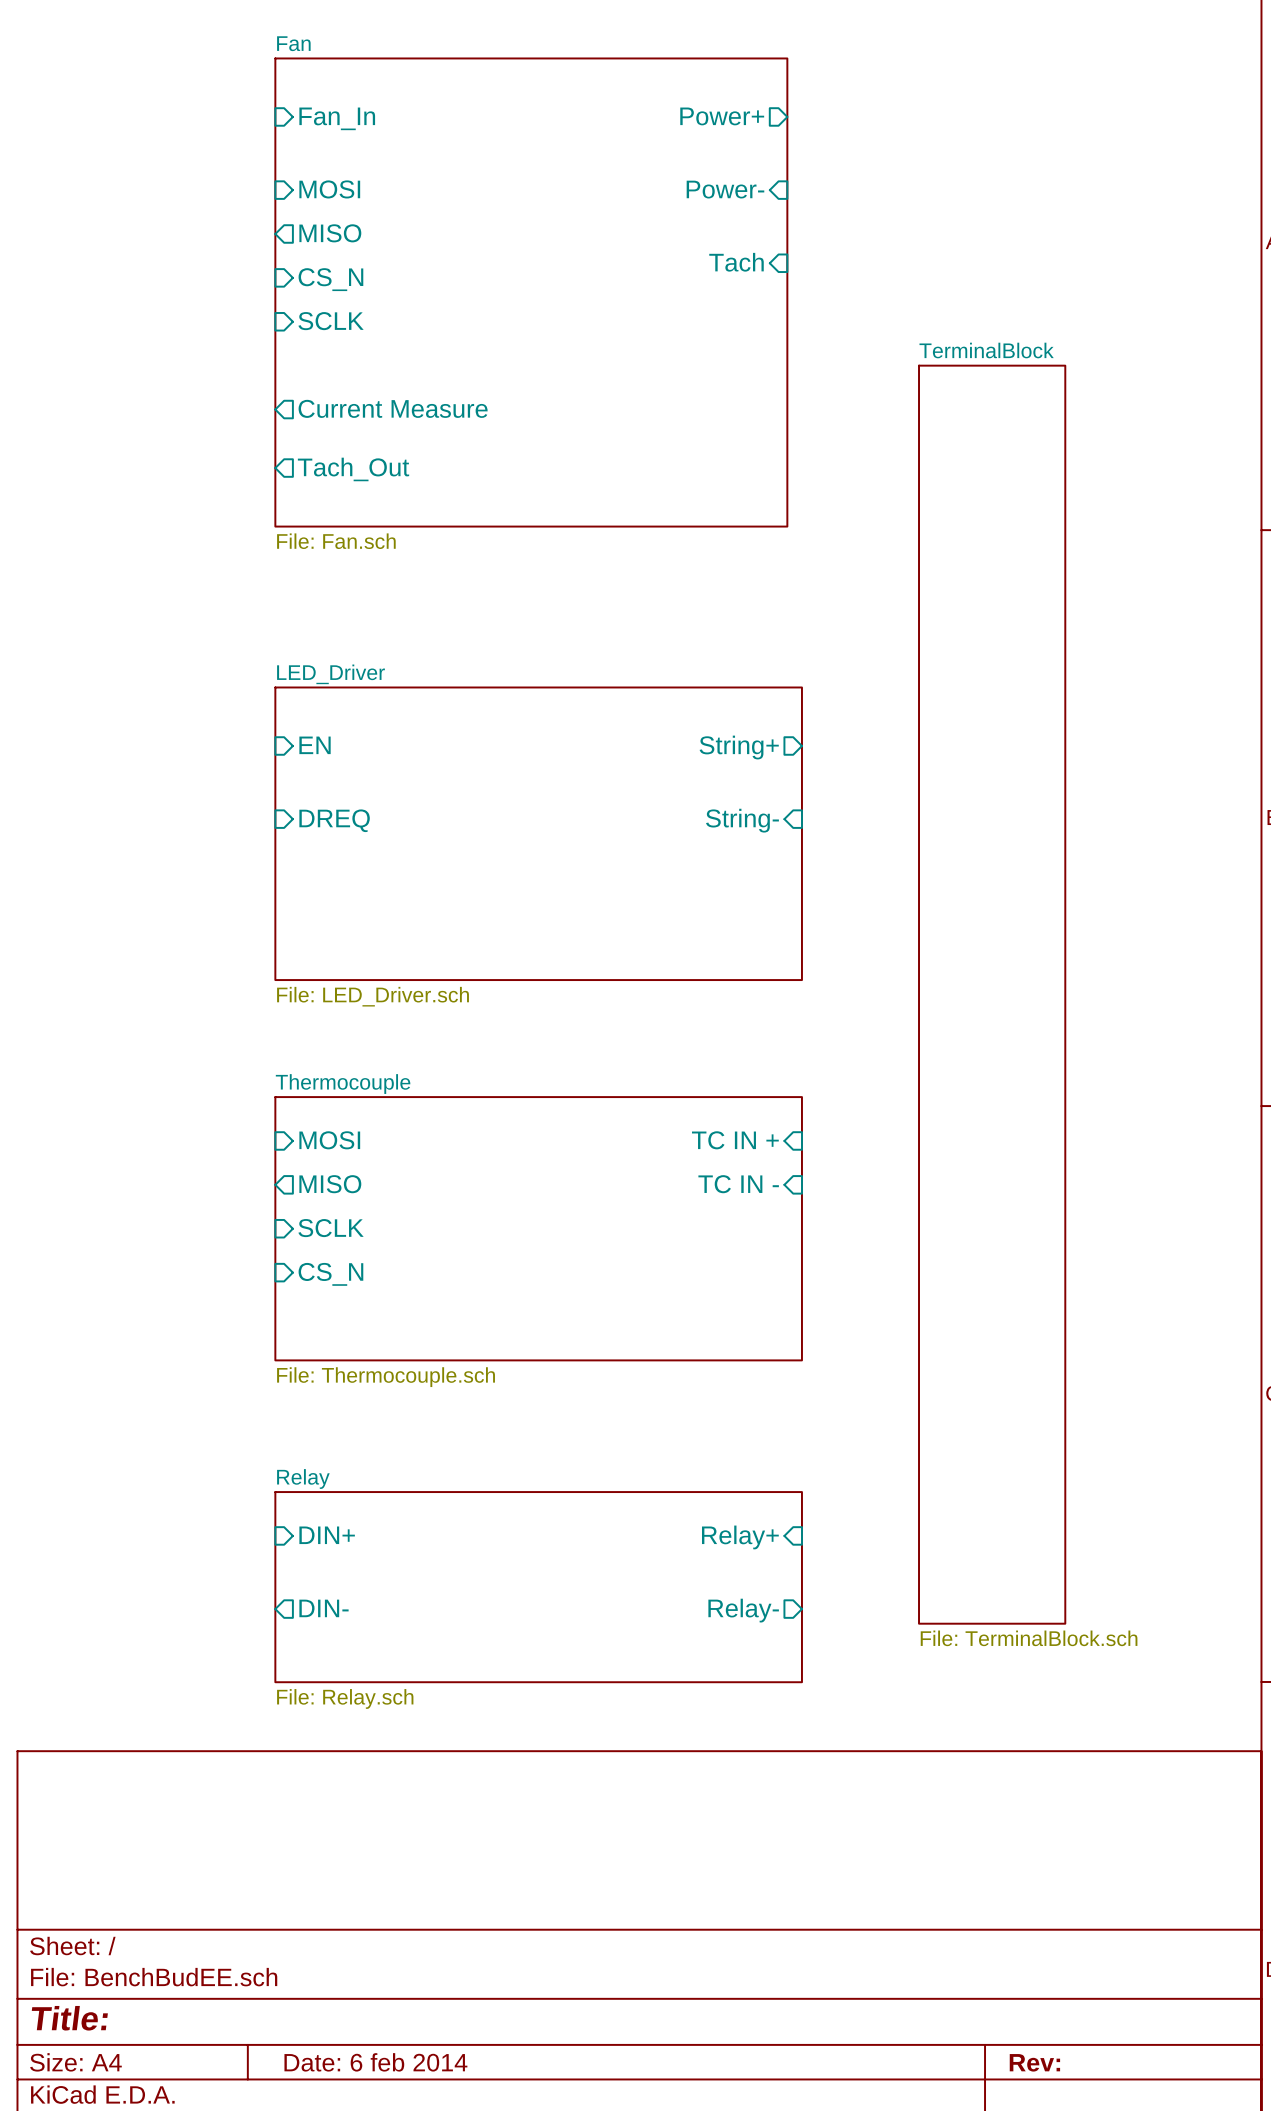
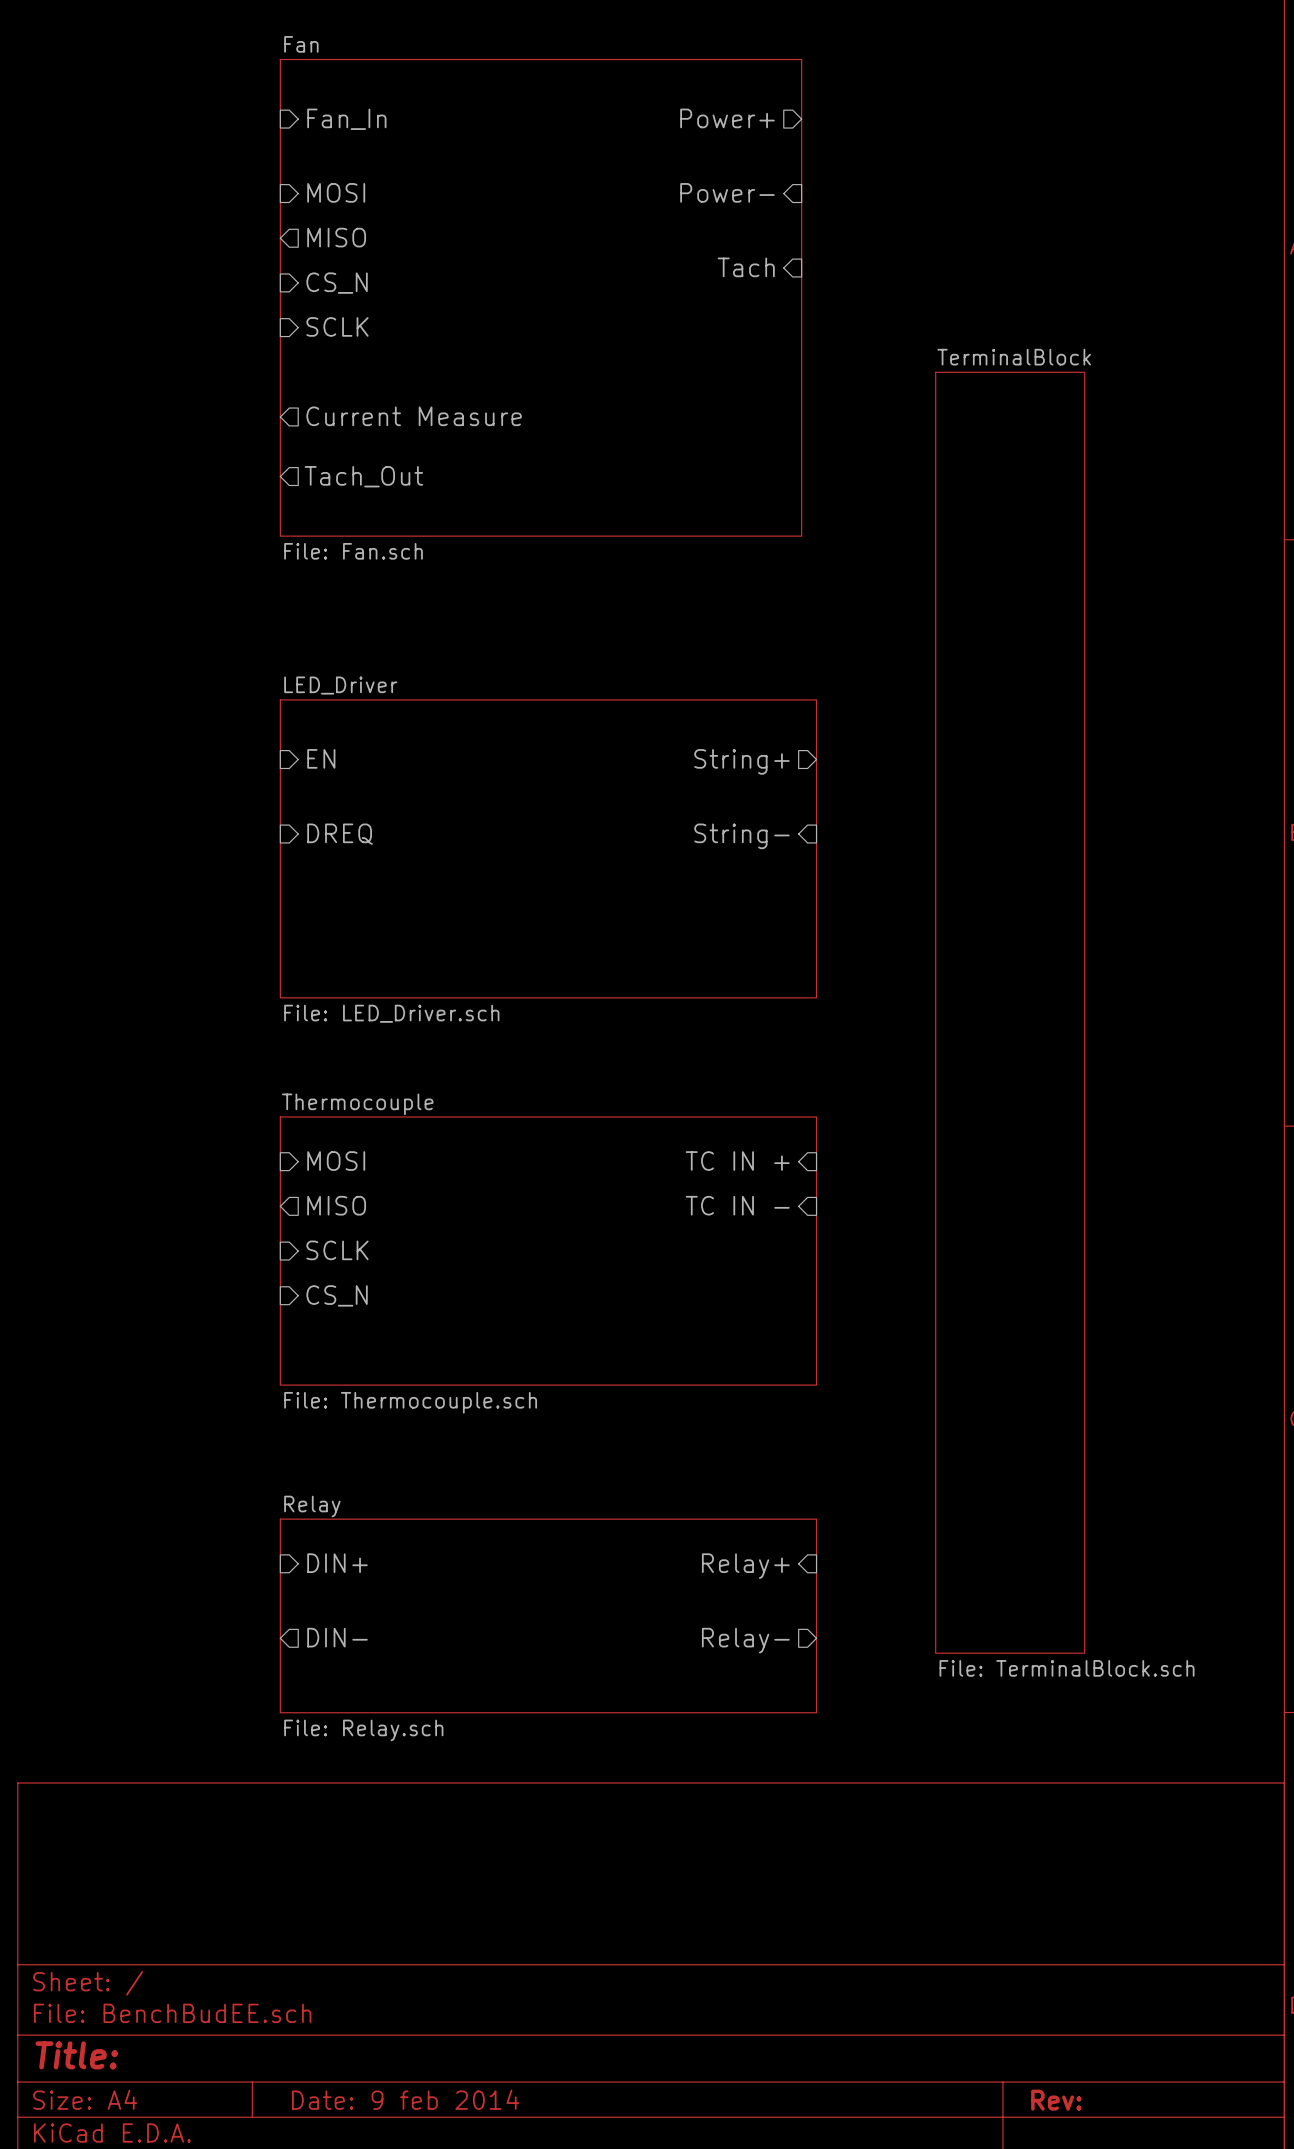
title block: Date: 6 feb 2014 (375, 2062) -> Date: 9 feb 2014 (405, 2099)

